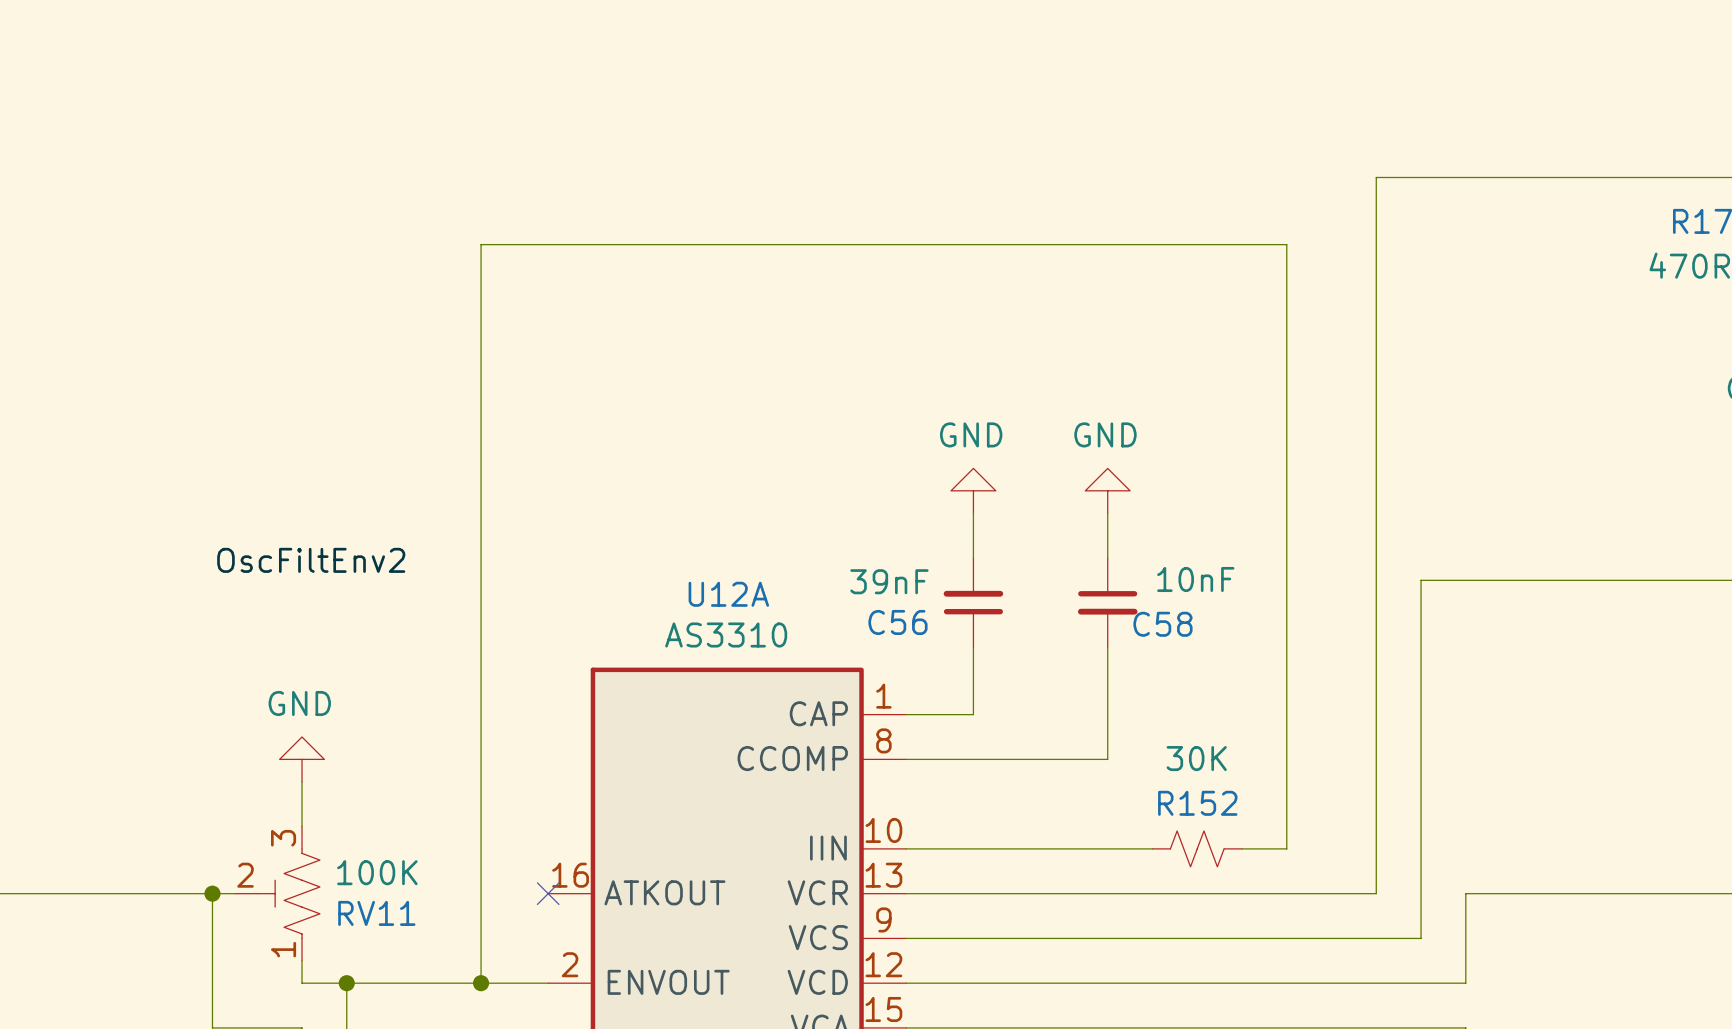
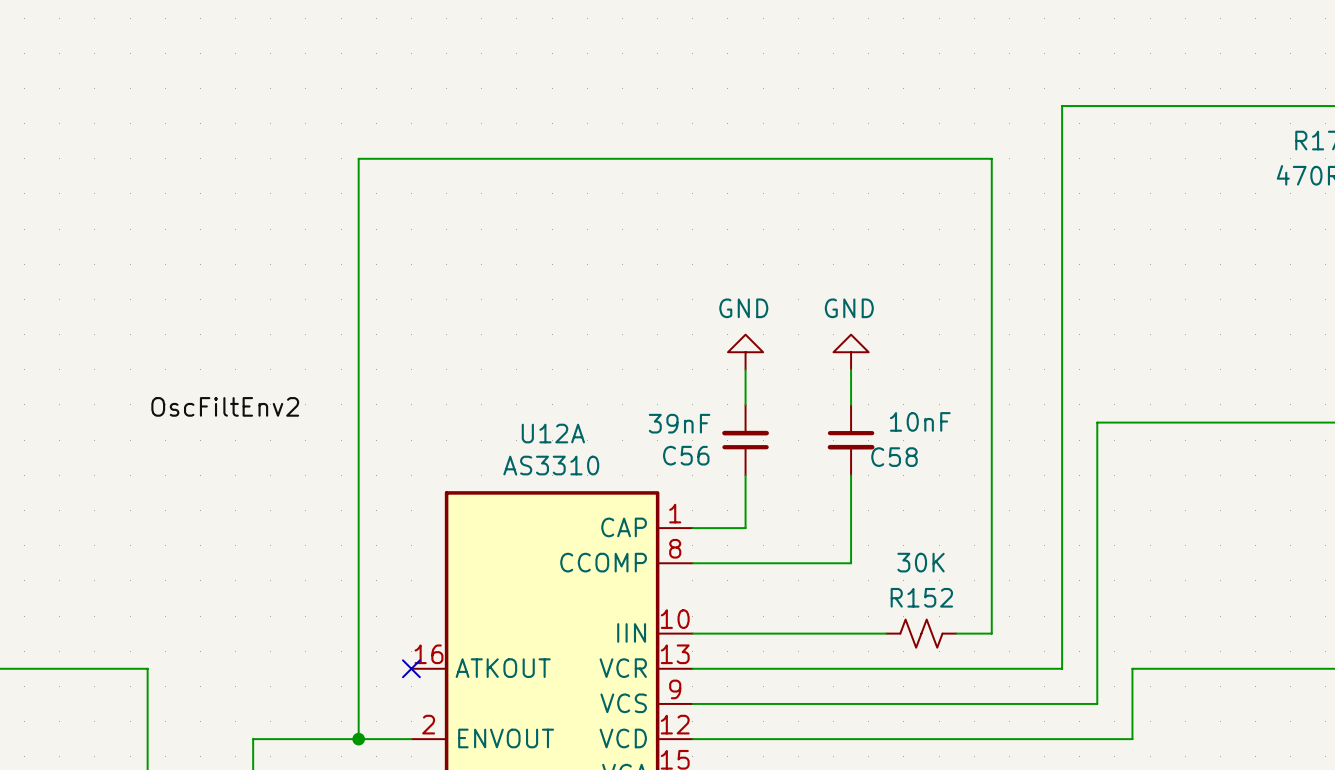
power symbol: GND (302, 759) -> none
wire: (302, 781) (302, 826) -> none
wire: (212, 893) (234, 893) -> none
junction: (212, 893) -> none
RV11: 100K (277, 893) -> none
wire: (302, 960) (302, 983) (346, 983) -> none
junction: (346, 983) -> none

